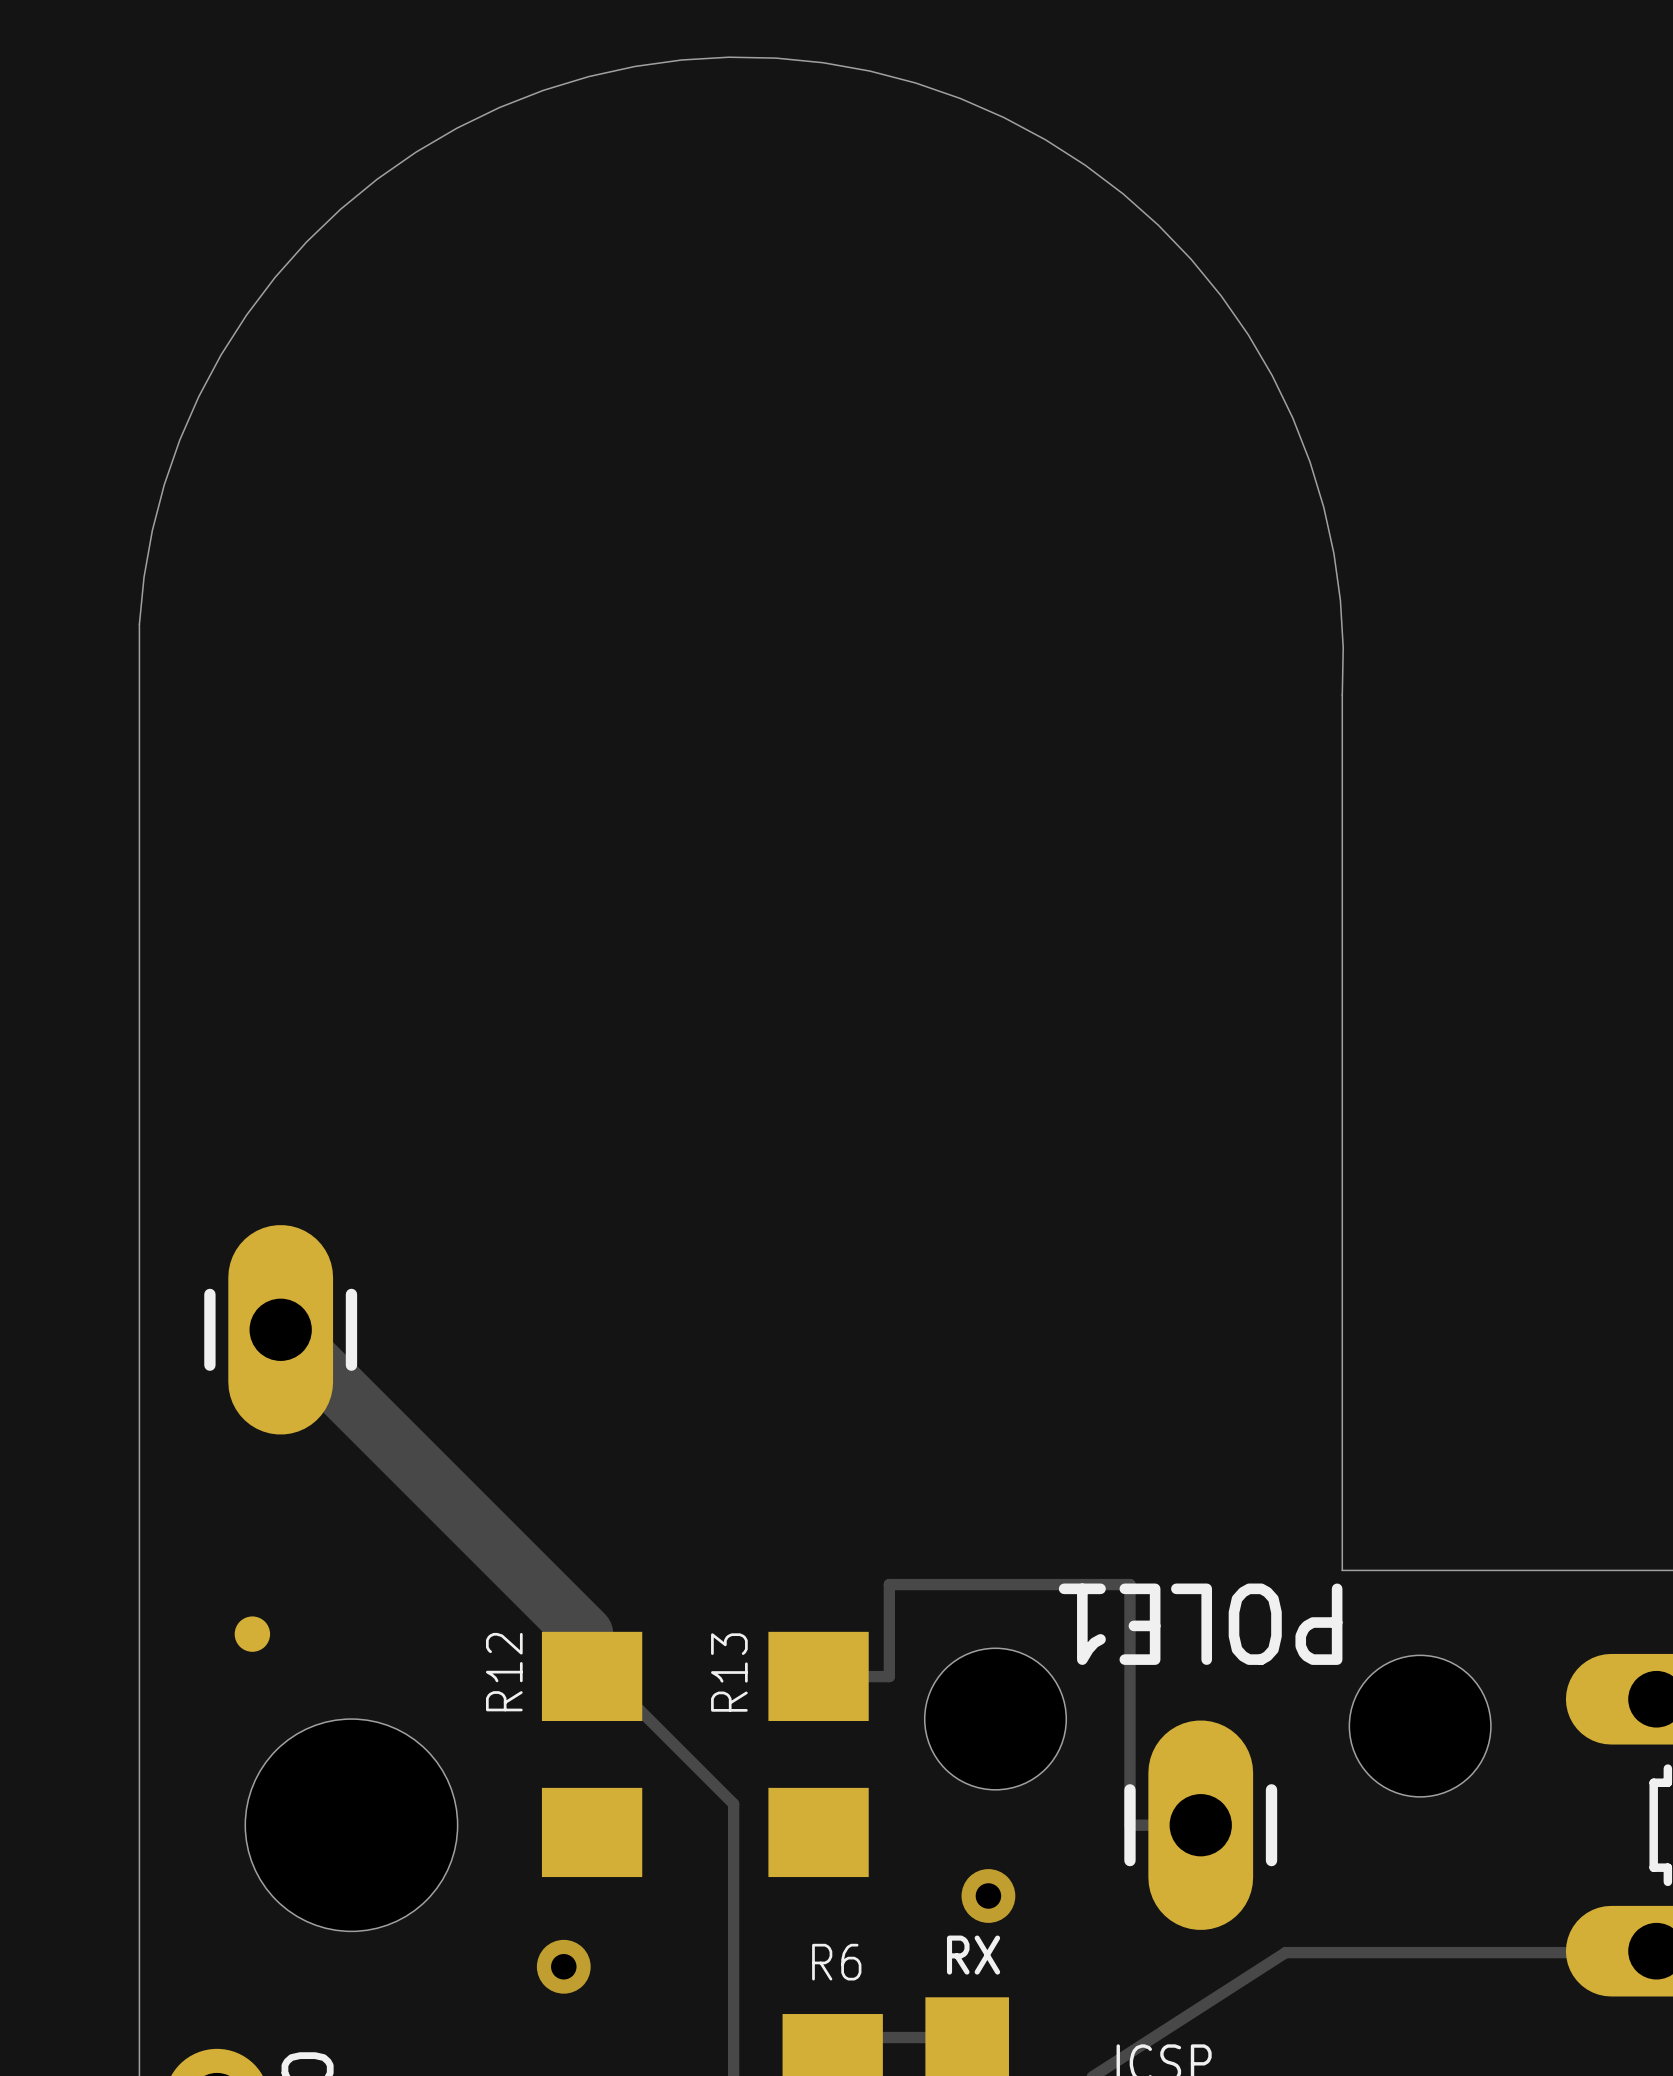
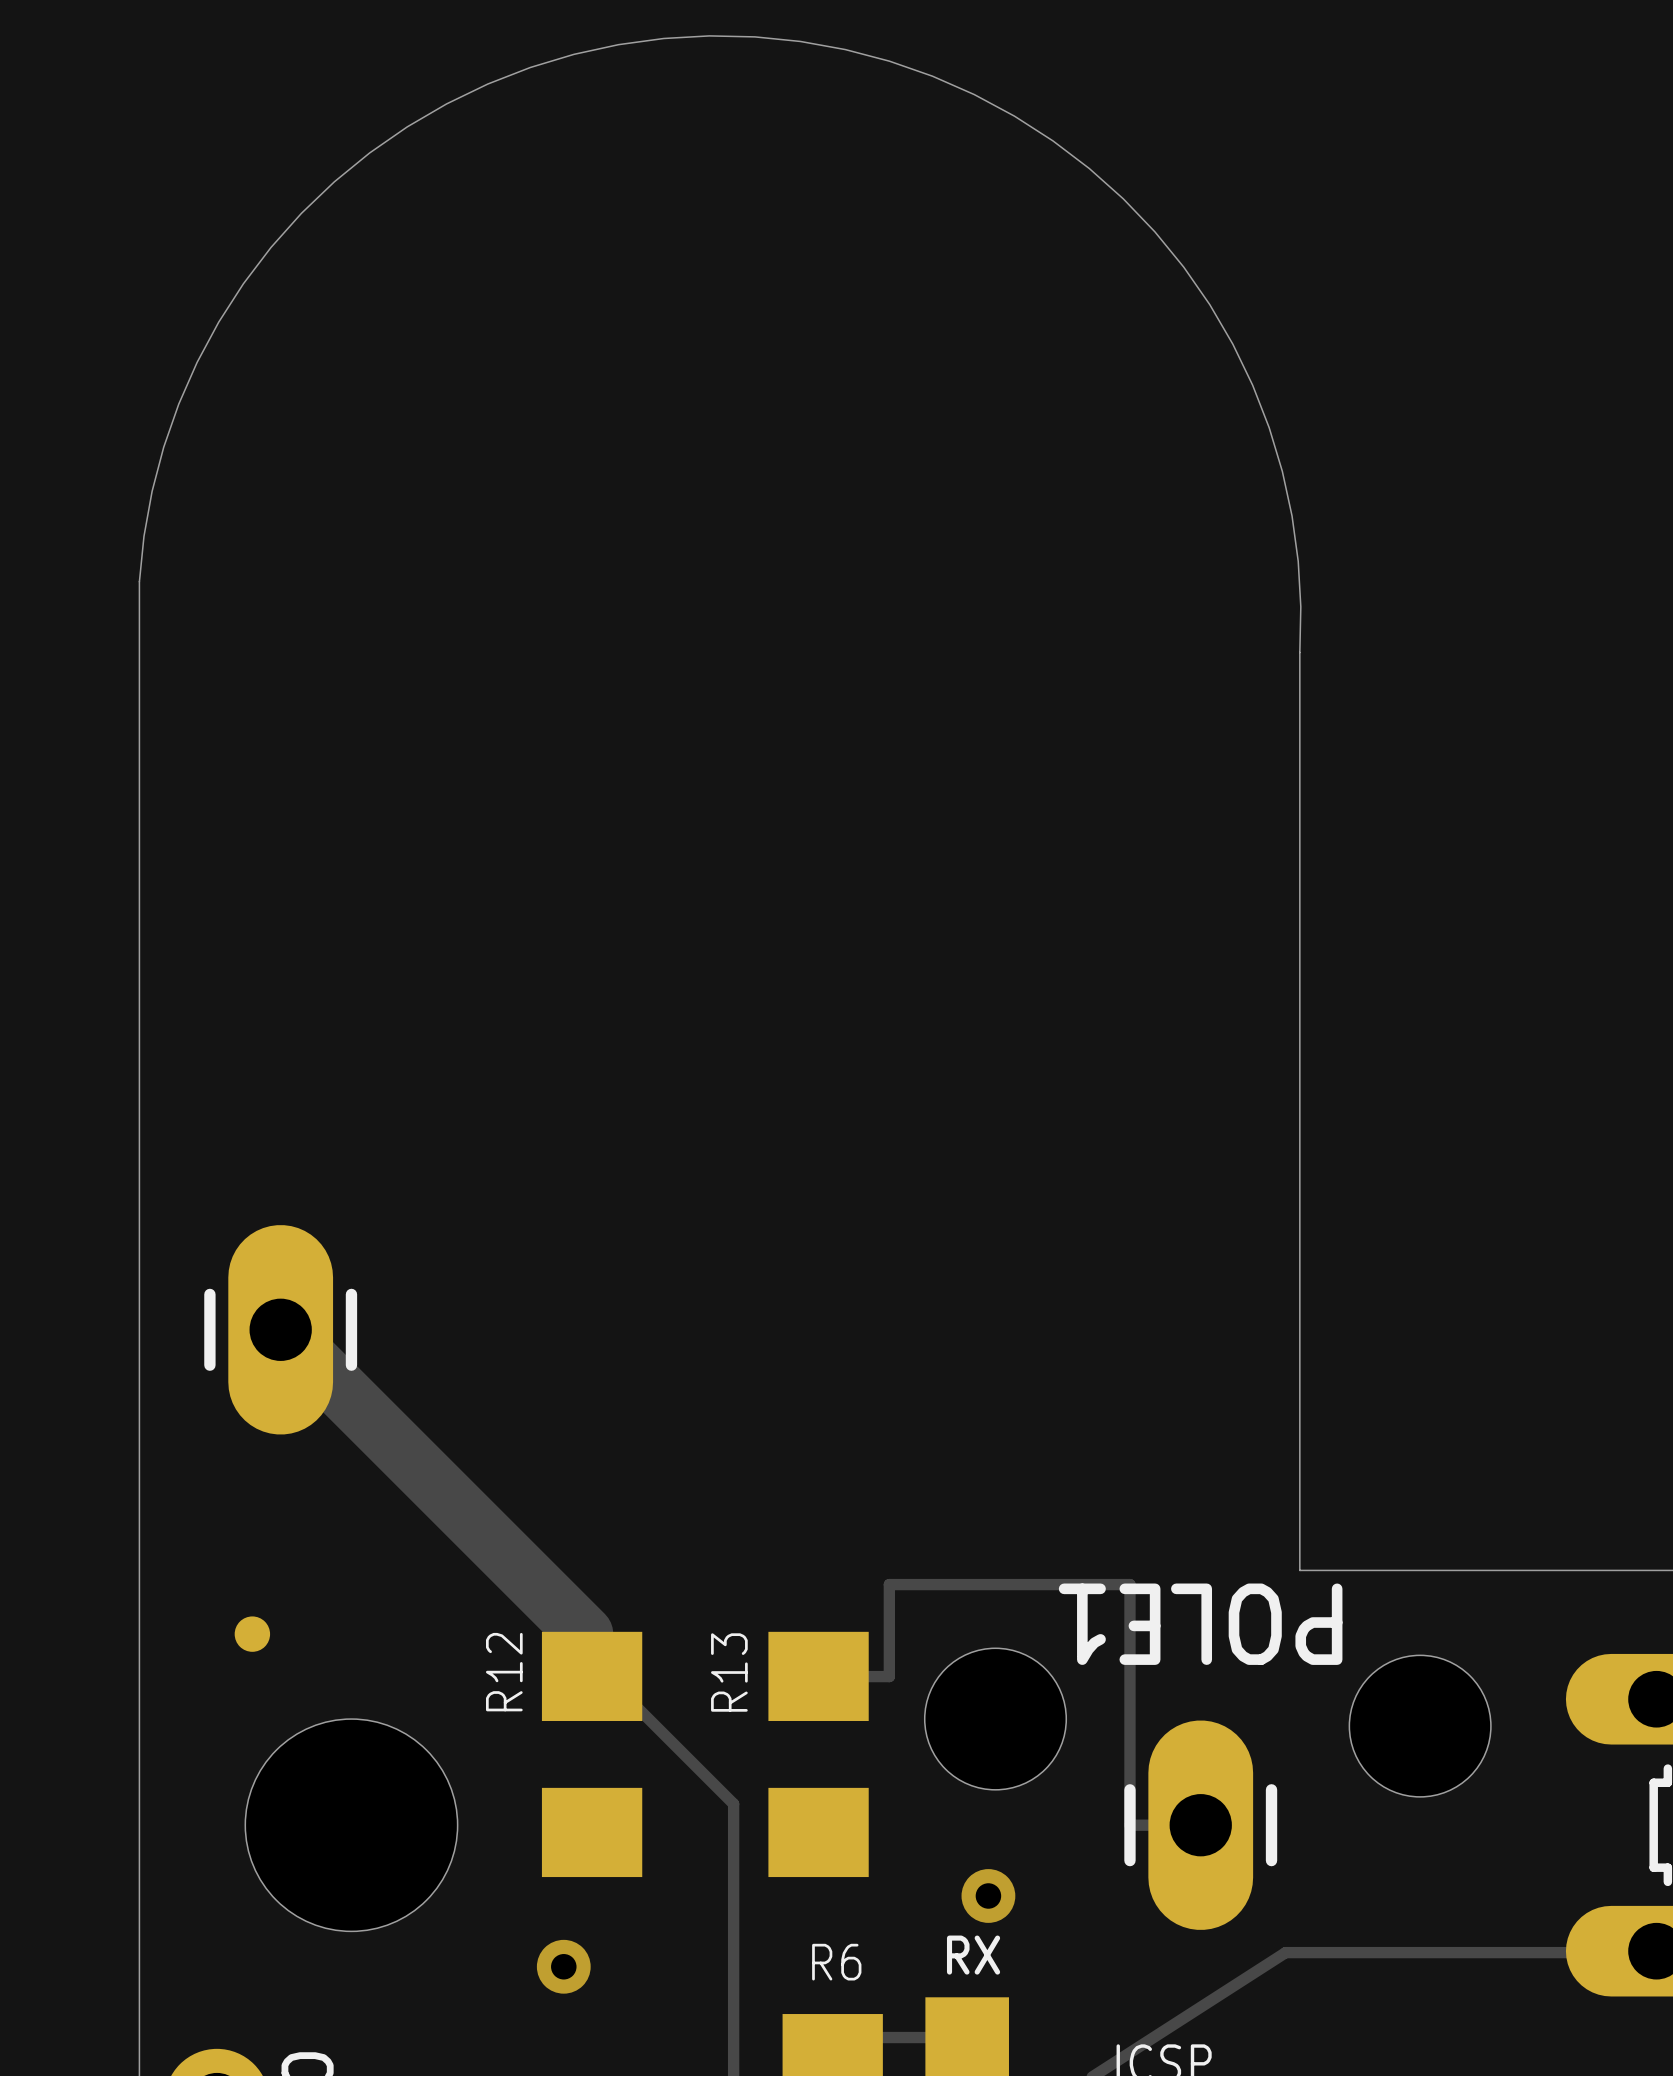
board edge: (139, 624) (144, 577) (152, 530) (164, 484) (179, 440) (198, 396) (221, 354) (246, 315) (275, 277) (306, 242) (340, 209) (377, 179) (415, 152) (456, 128) (499, 107) (543, 90) (588, 76) (634, 66) (681, 59) (728, 57) (776, 58) (823, 62) (869, 71) (915, 83) (960, 98) (1003, 117) (1045, 139) (1085, 165) (1123, 193) (1158, 225) (1191, 259) (1221, 295) (1248, 334) (1272, 375) (1292, 418) (1310, 462) (1323, 507) (1333, 553) (1340, 600) (1343, 647) (1342, 1570) -> (139, 624) (139, 581) (143, 536) (152, 491) (163, 447) (178, 404) (197, 362) (218, 322) (243, 283) (271, 247) (301, 213) (334, 181) (369, 152) (407, 126) (446, 103) (487, 84) (530, 67) (573, 54) (618, 44) (663, 38) (709, 35) (755, 36) (800, 41) (845, 49) (889, 61) (932, 76) (974, 94) (1014, 116) (1052, 140) (1089, 168) (1123, 198) (1154, 231) (1183, 267) (1209, 304) (1232, 344) (1252, 385) (1269, 427) (1282, 471) (1292, 516) (1298, 561) (1300, 606) (1299, 1570) (1342, 1570)

